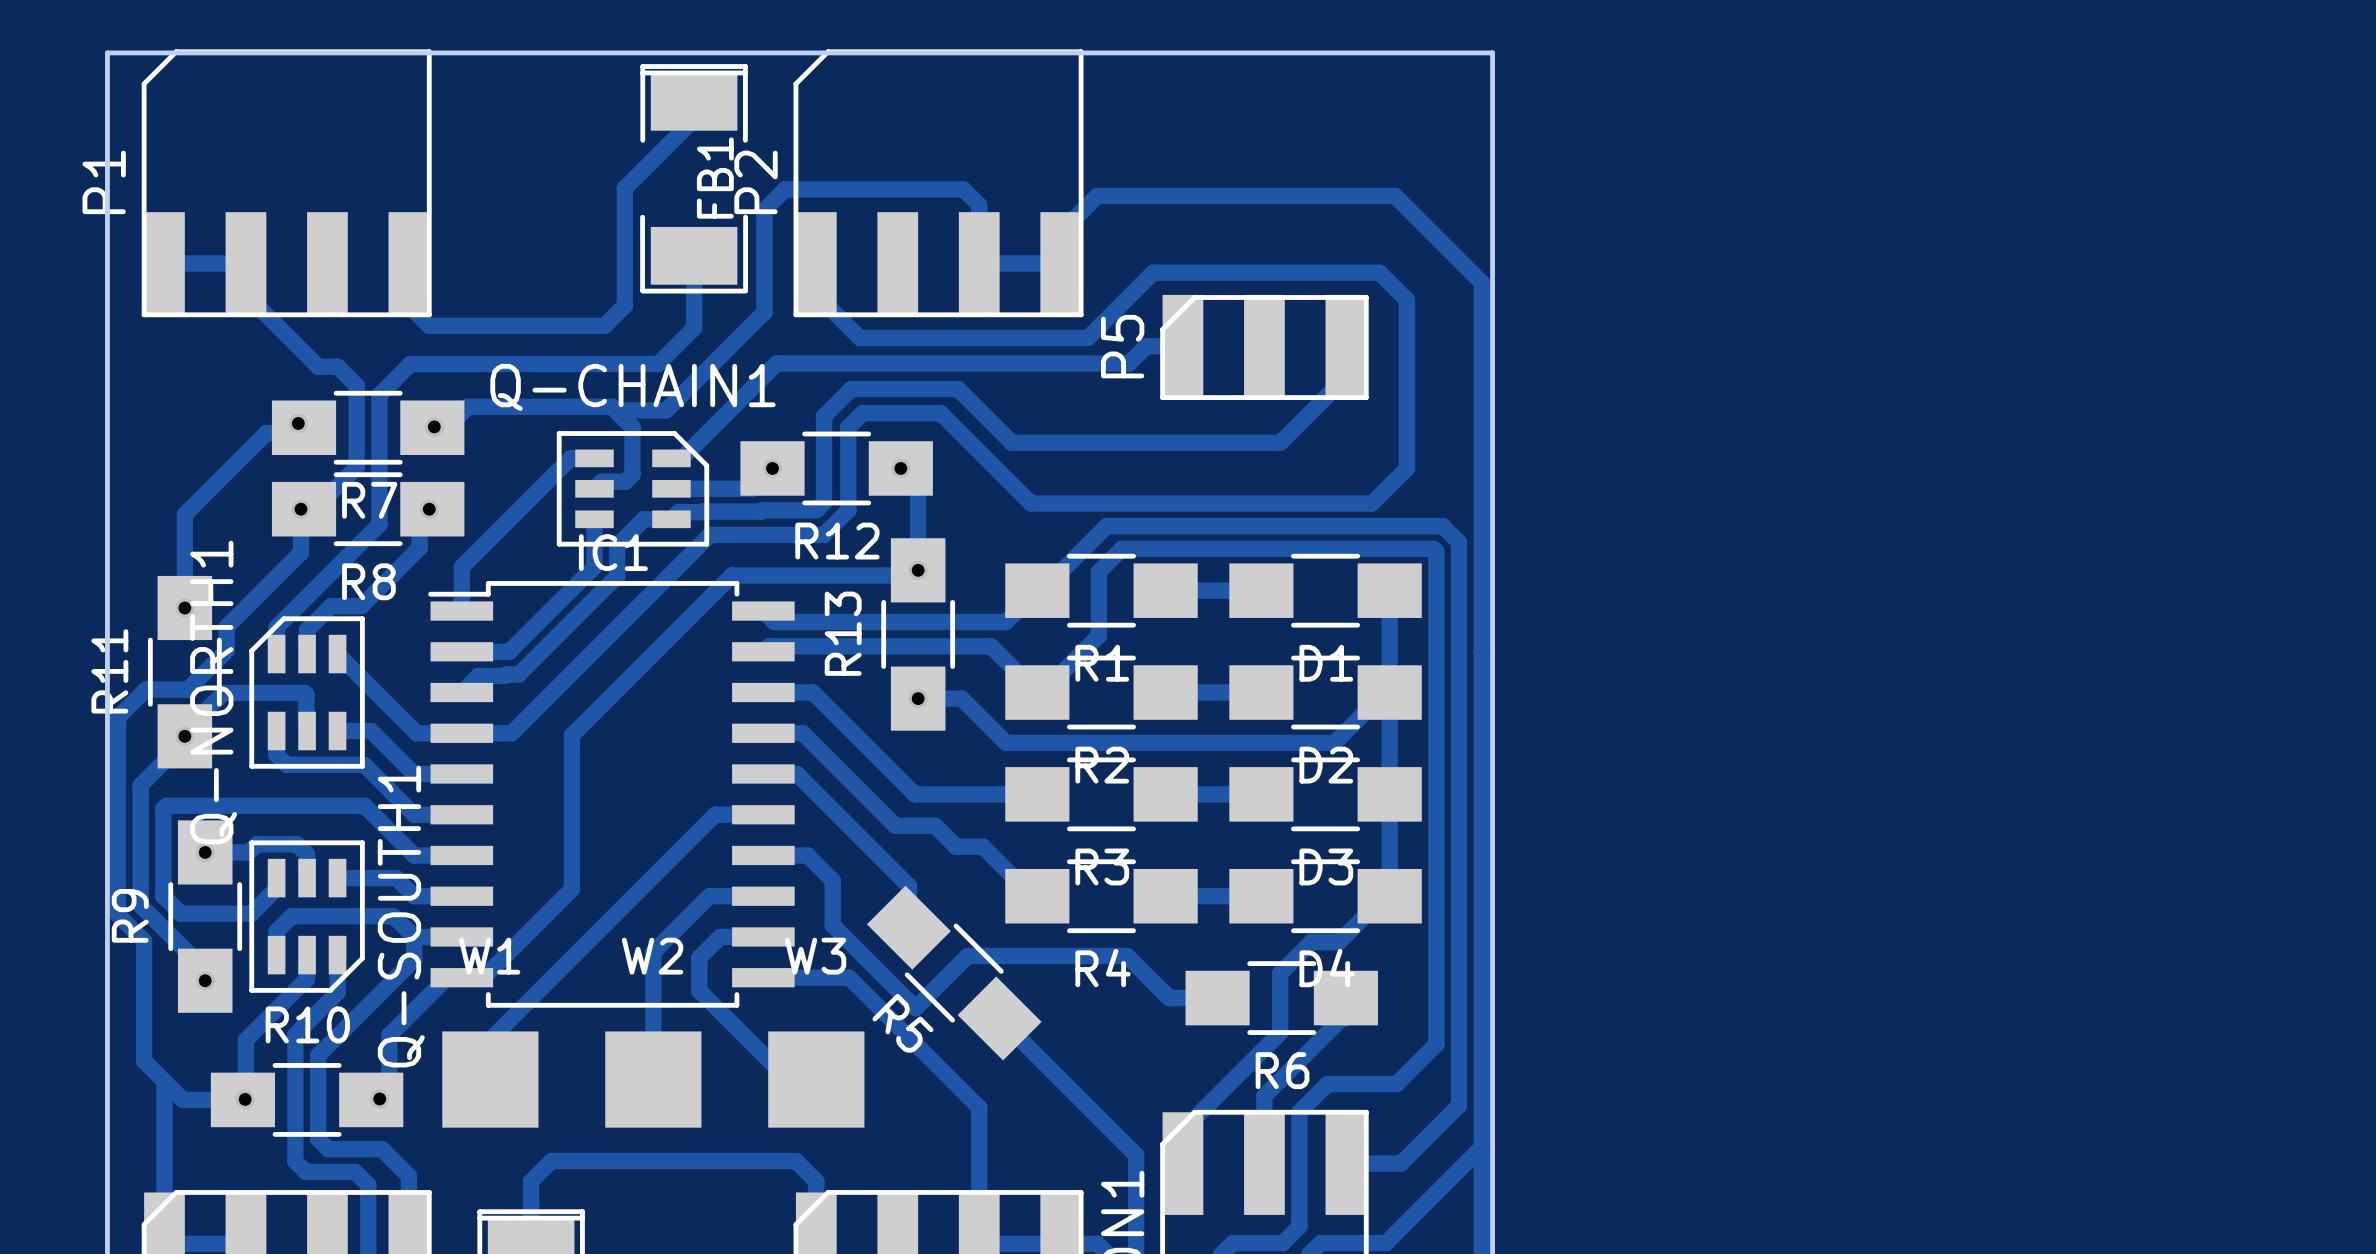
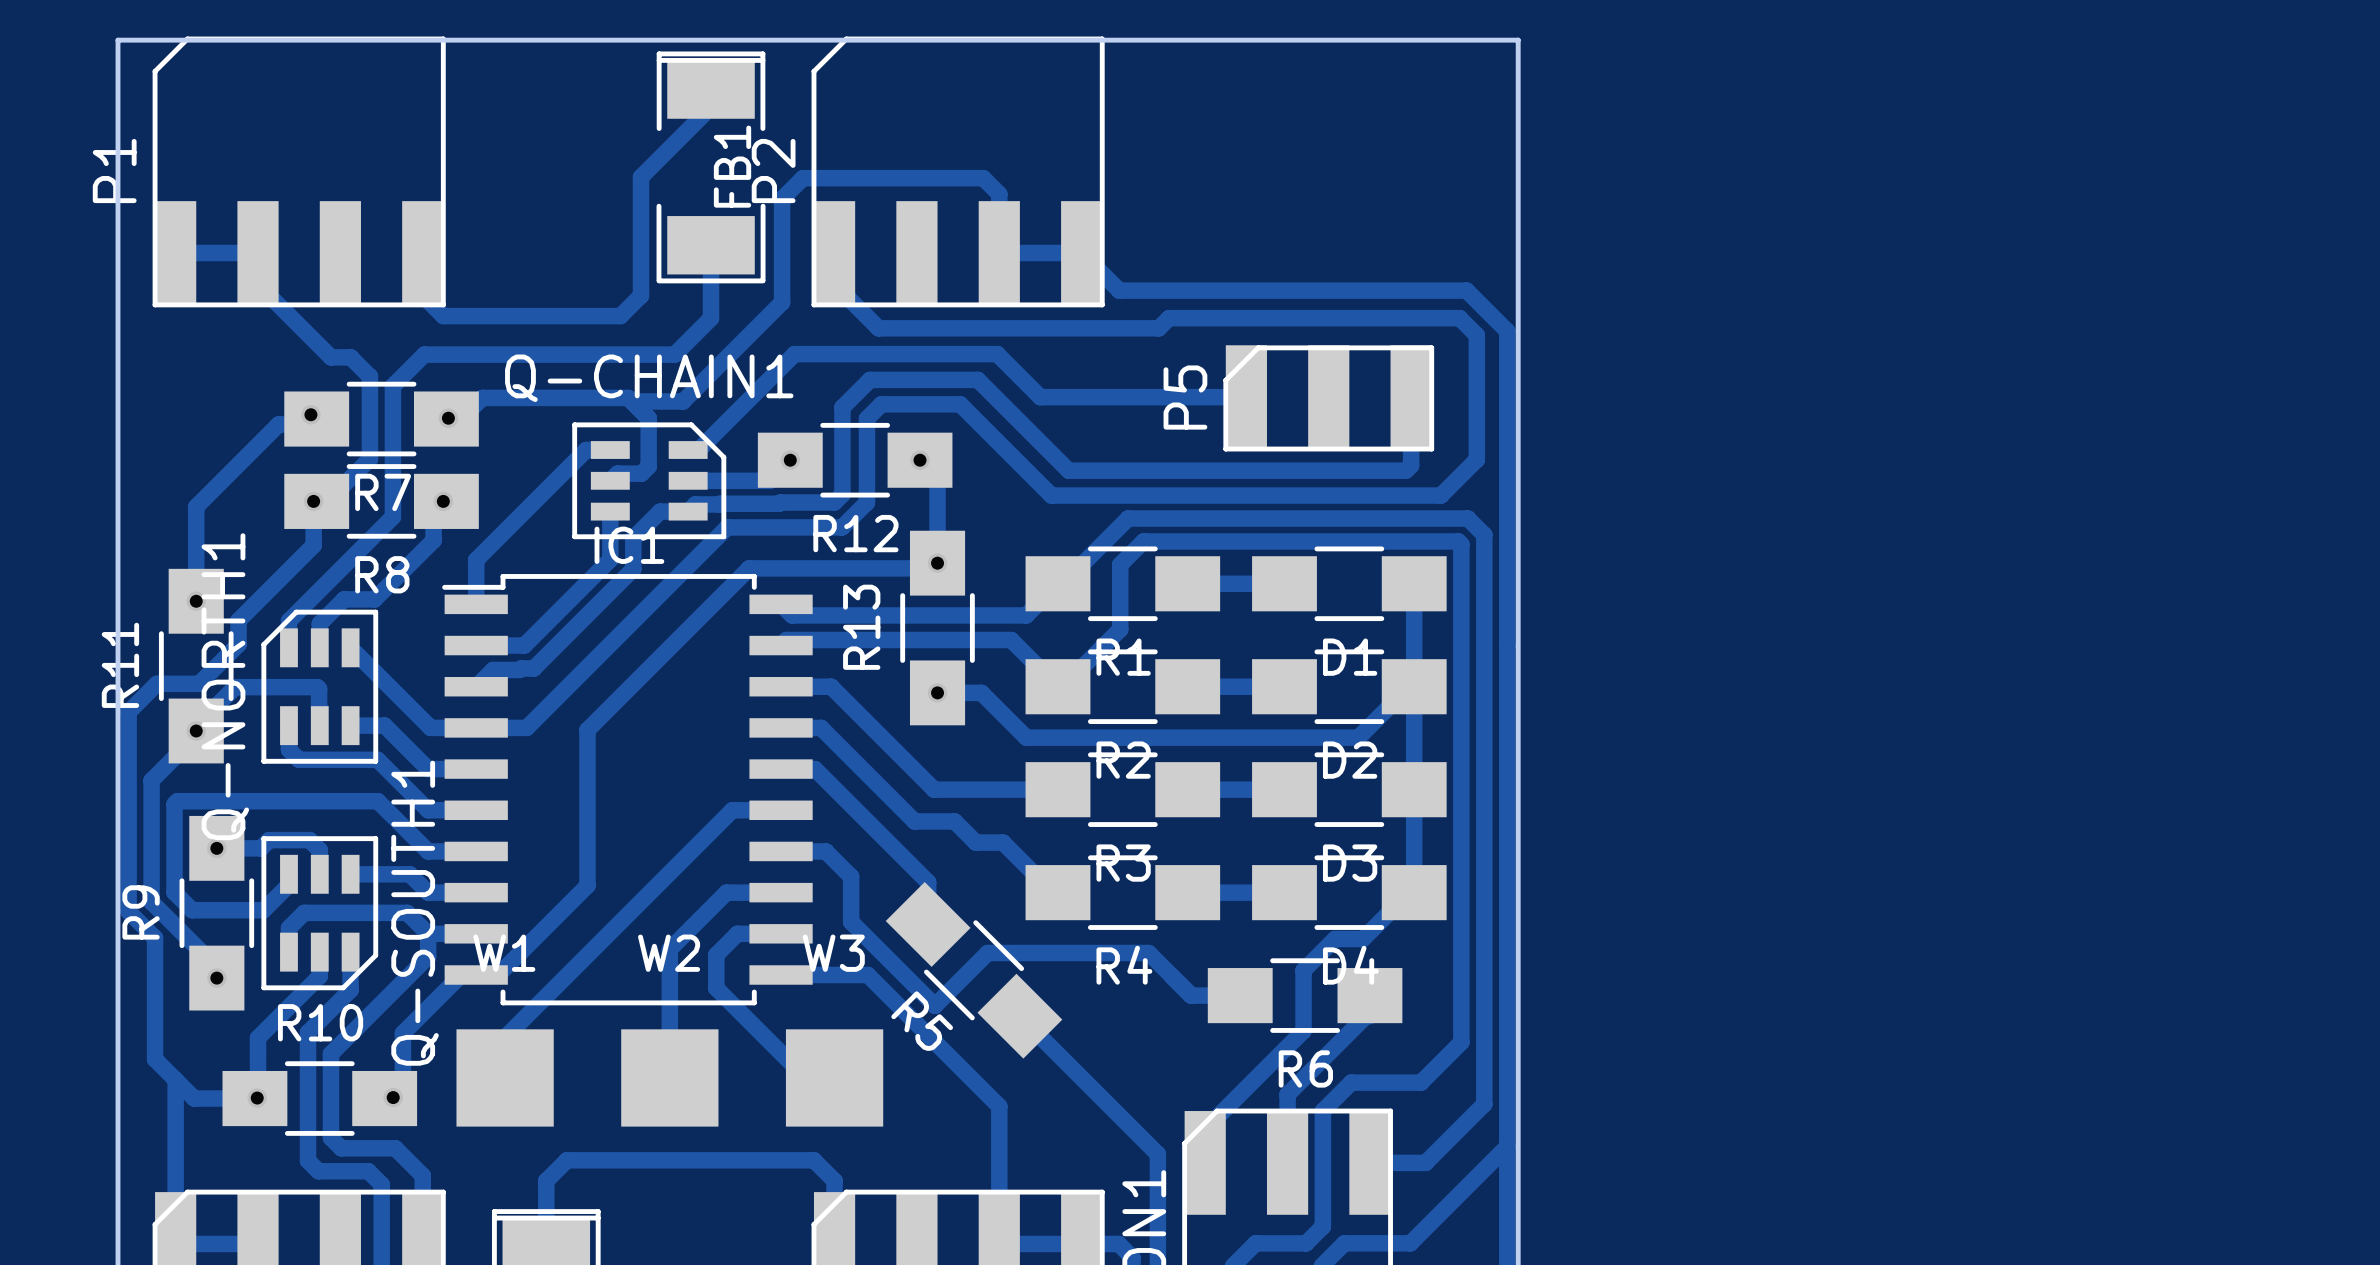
track: (1060, 263) (1060, 232) (1097, 195) (1394, 195) (1481, 282) (1481, 340) -> (1081, 253) (1119, 290) (1466, 290) (1507, 331)
track: (1087, 337) (1153, 272) (1379, 272) (1407, 300) (1407, 468) (1372, 503) -> (1109, 328) (1158, 328) (1169, 318) (1459, 318) (1476, 335) (1476, 459) (1440, 495) (1396, 495)
track: (1182, 346) (1146, 346) (1129, 363) (977, 363) -> (1246, 397) (1040, 397) (997, 354)
track: (1345, 346) (1345, 377) (1280, 442) (1011, 442) -> (1411, 397) (1411, 465) (1405, 470) (1068, 470) (1032, 434)
P5 position: (1264, 347) -> (1328, 398)

